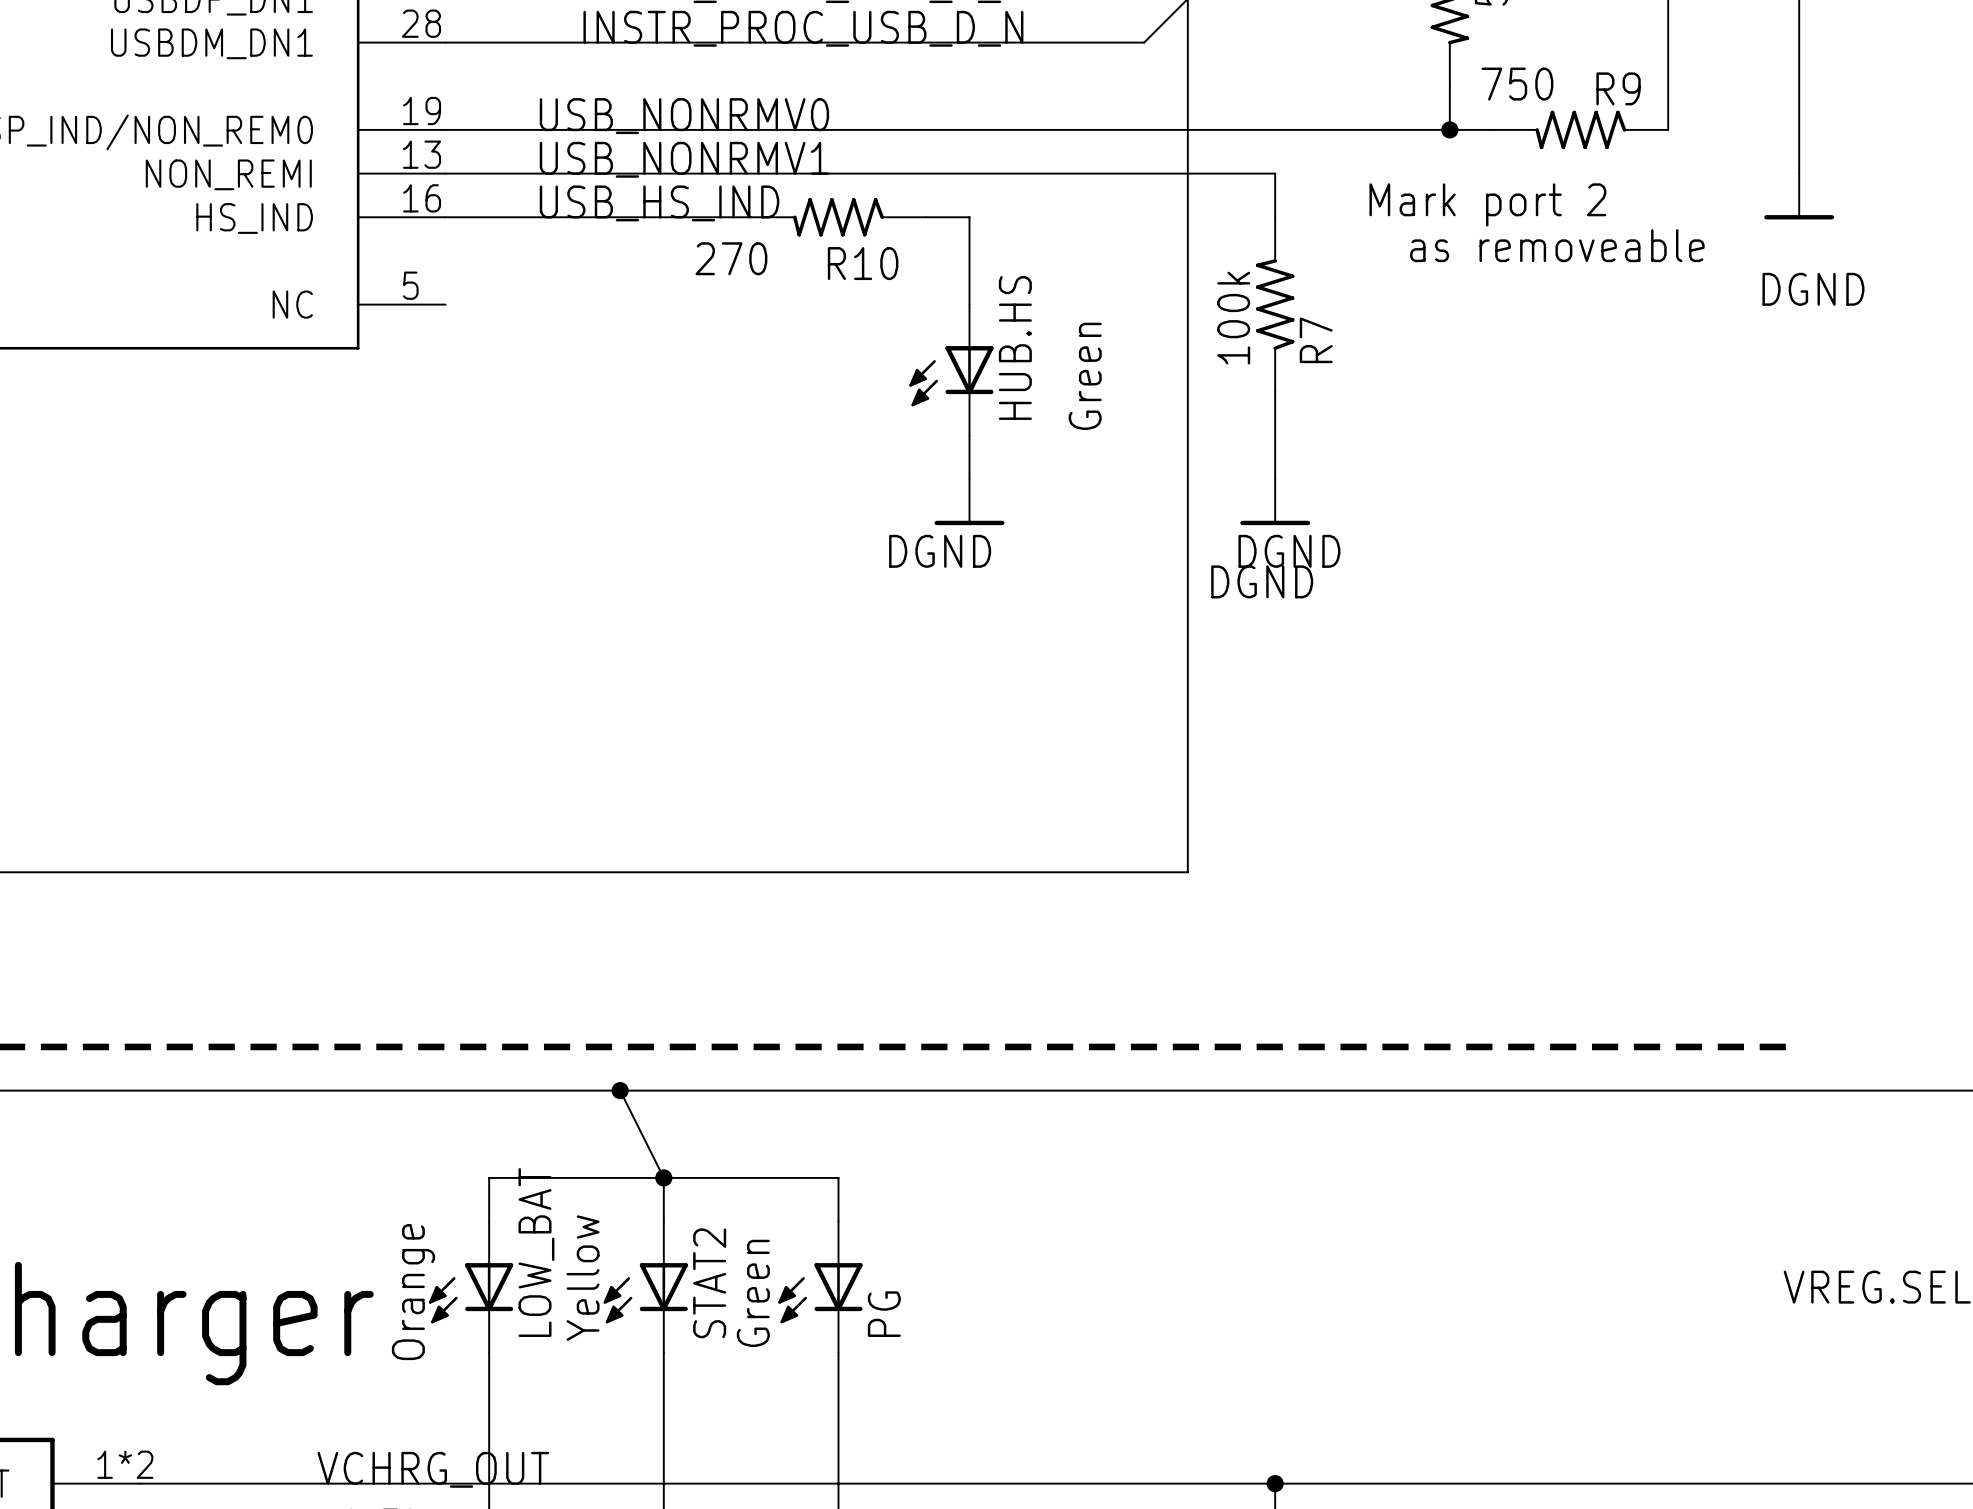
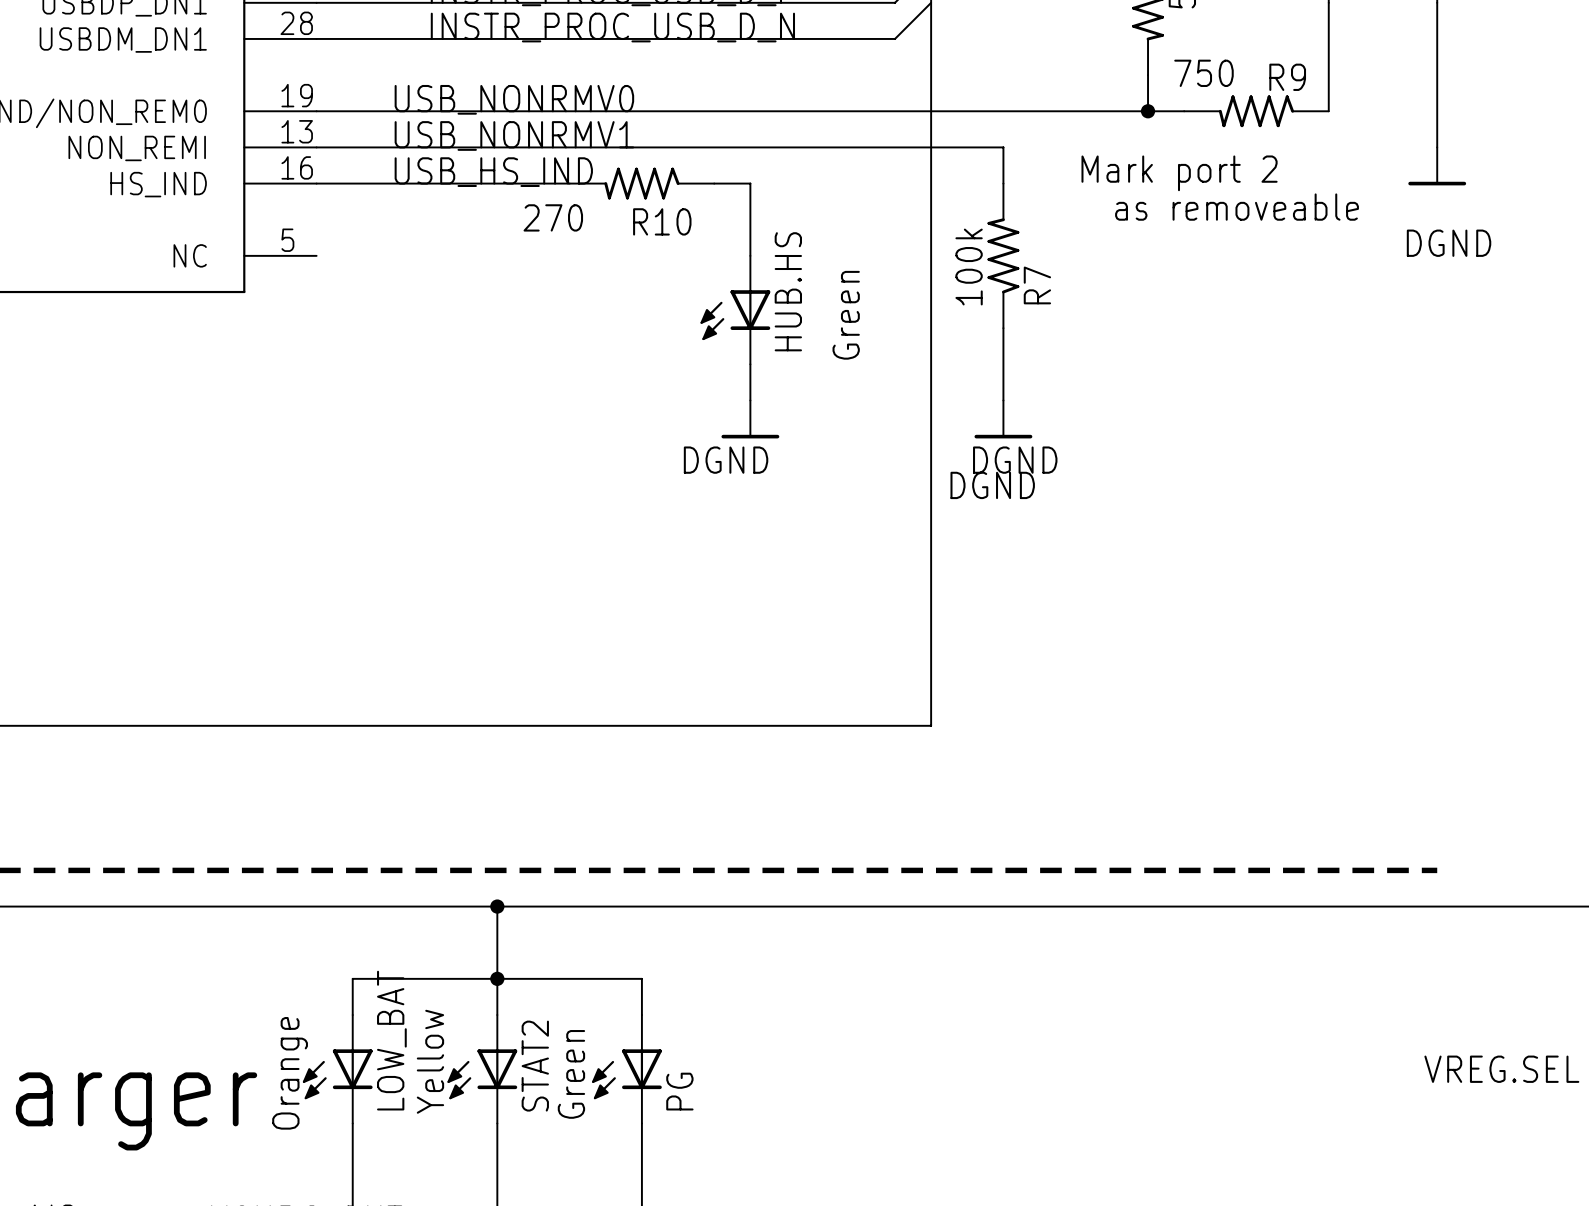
wire: (620, 1090) (663, 1177) -> (497, 906) (497, 978)
junction position: (620, 1090) -> (497, 906)

